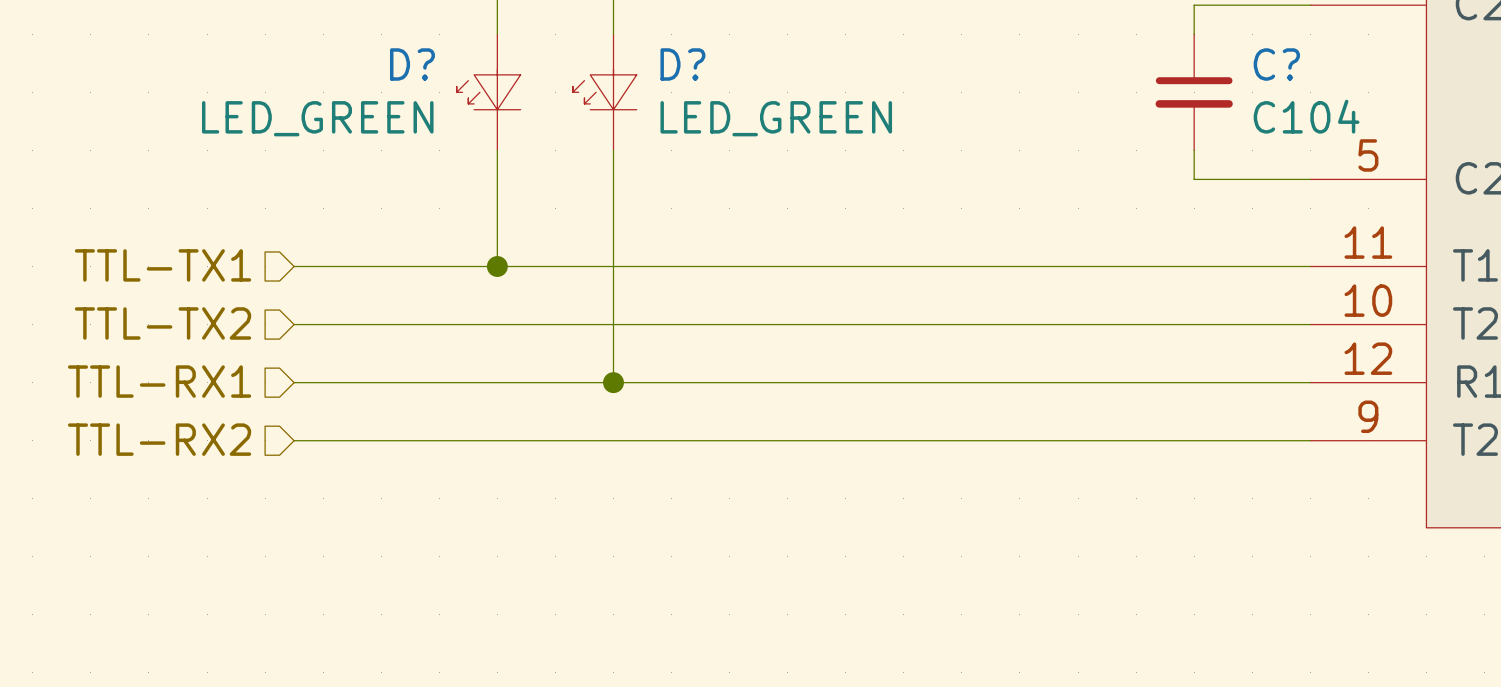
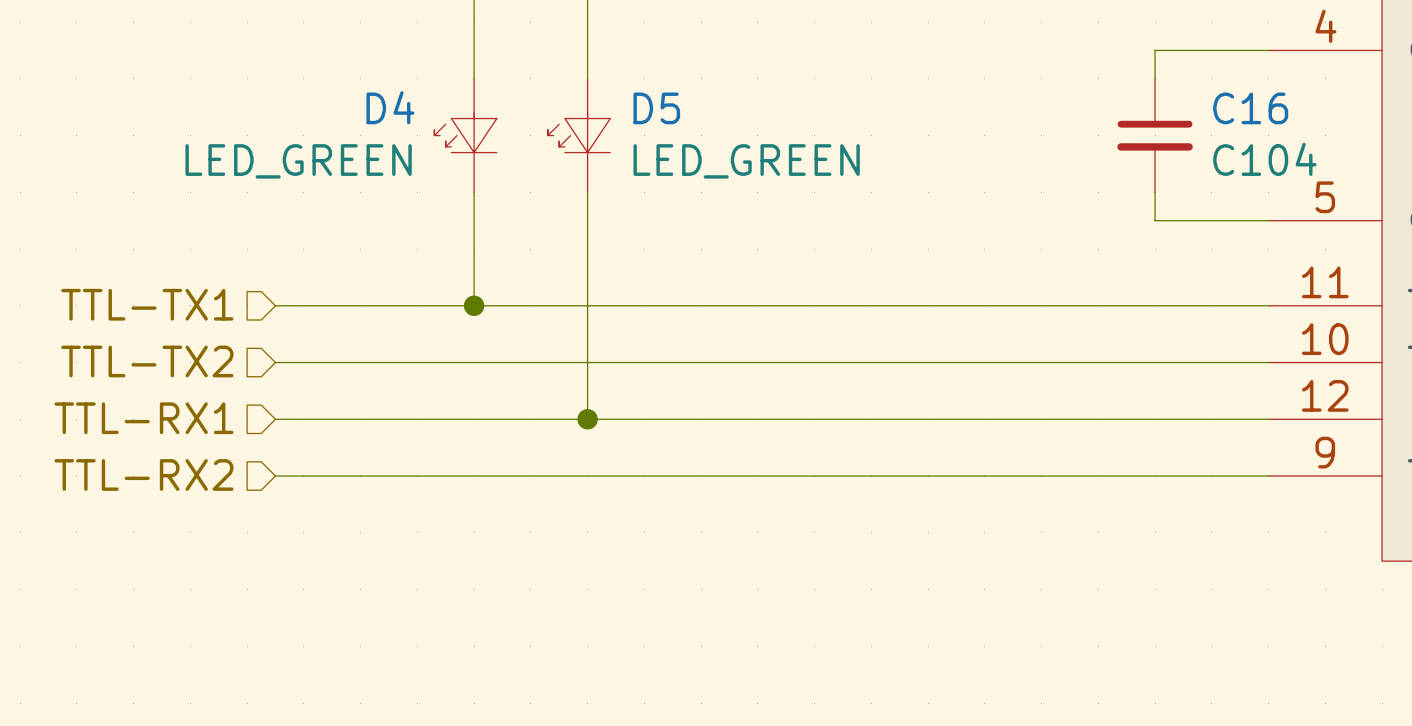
D? name: D? (412, 64) -> D4 (390, 107)
D? name: D? (682, 64) -> D5 (656, 108)
C? name: C? (1276, 64) -> C16 (1250, 108)

